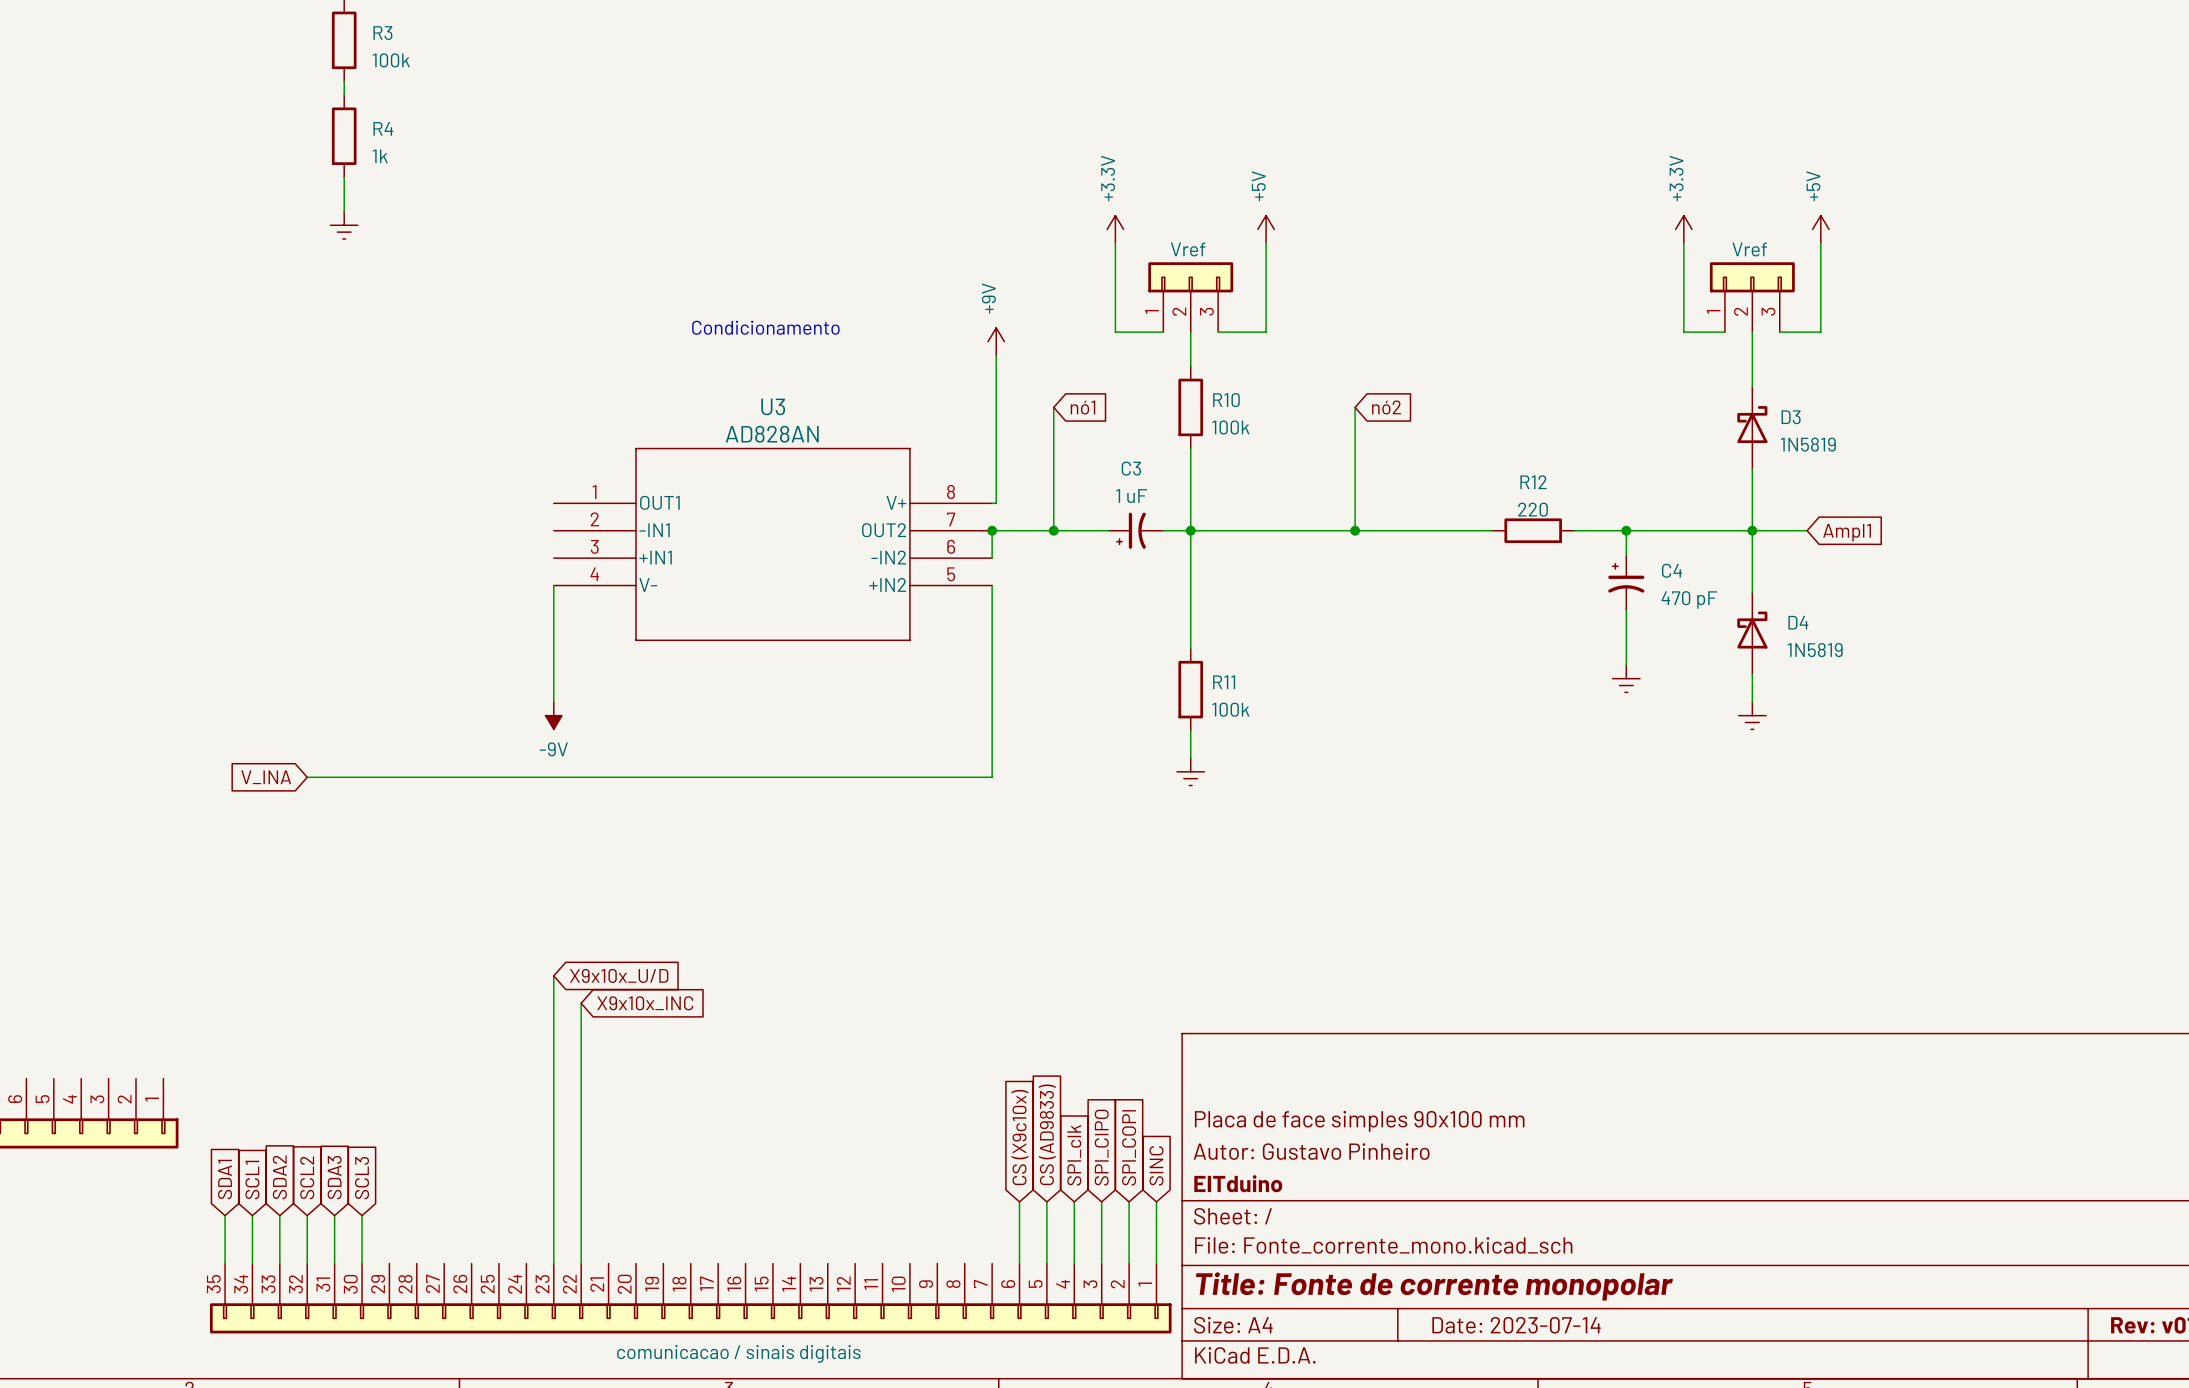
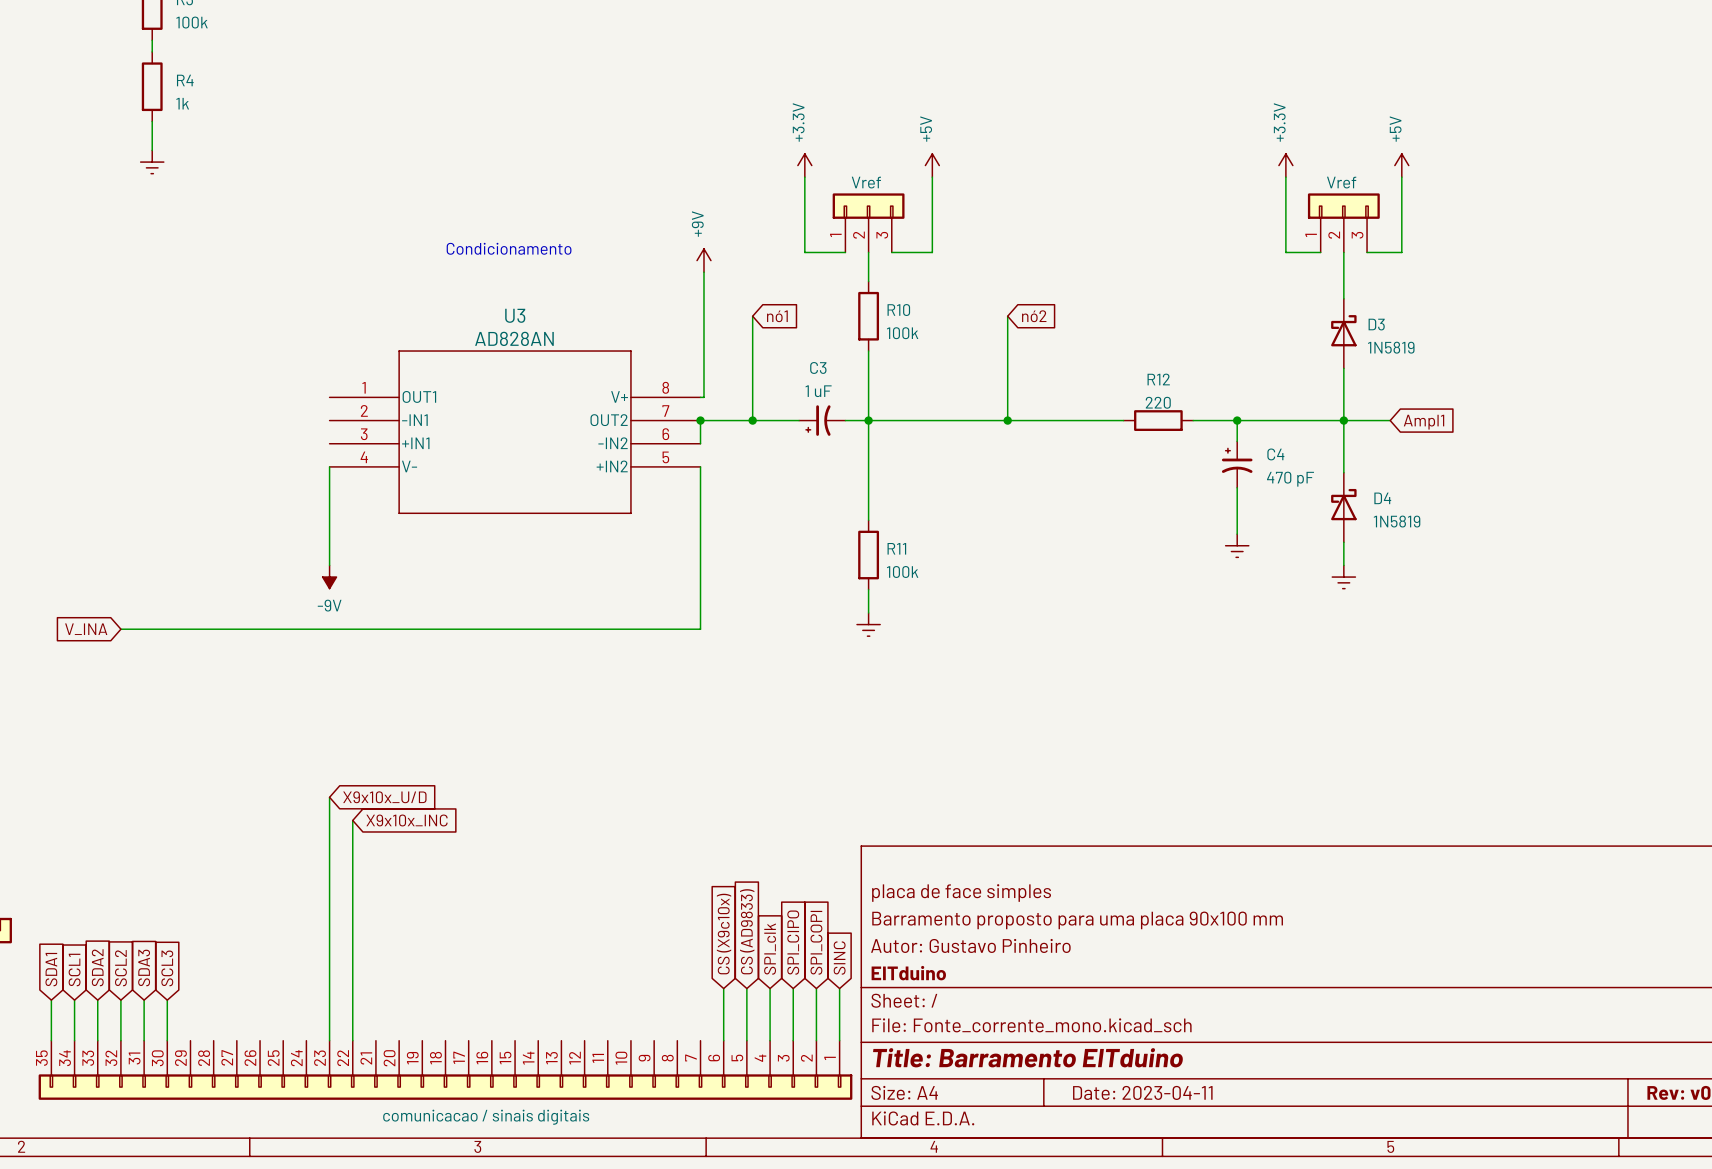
title block: none -> placa de face simples (961, 893)
title block: Placa de face simples 90x100 mm (1359, 1121) -> Barramento proposto para uma placa 90x100 mm (1077, 920)
title block: Title: Fonte de corrente monopolar (1434, 1286) -> Title: Barramento EITduino (1027, 1057)
title block: Date: 2023-07-14 (1516, 1325) -> Date: 2023-04-11 (1142, 1092)

